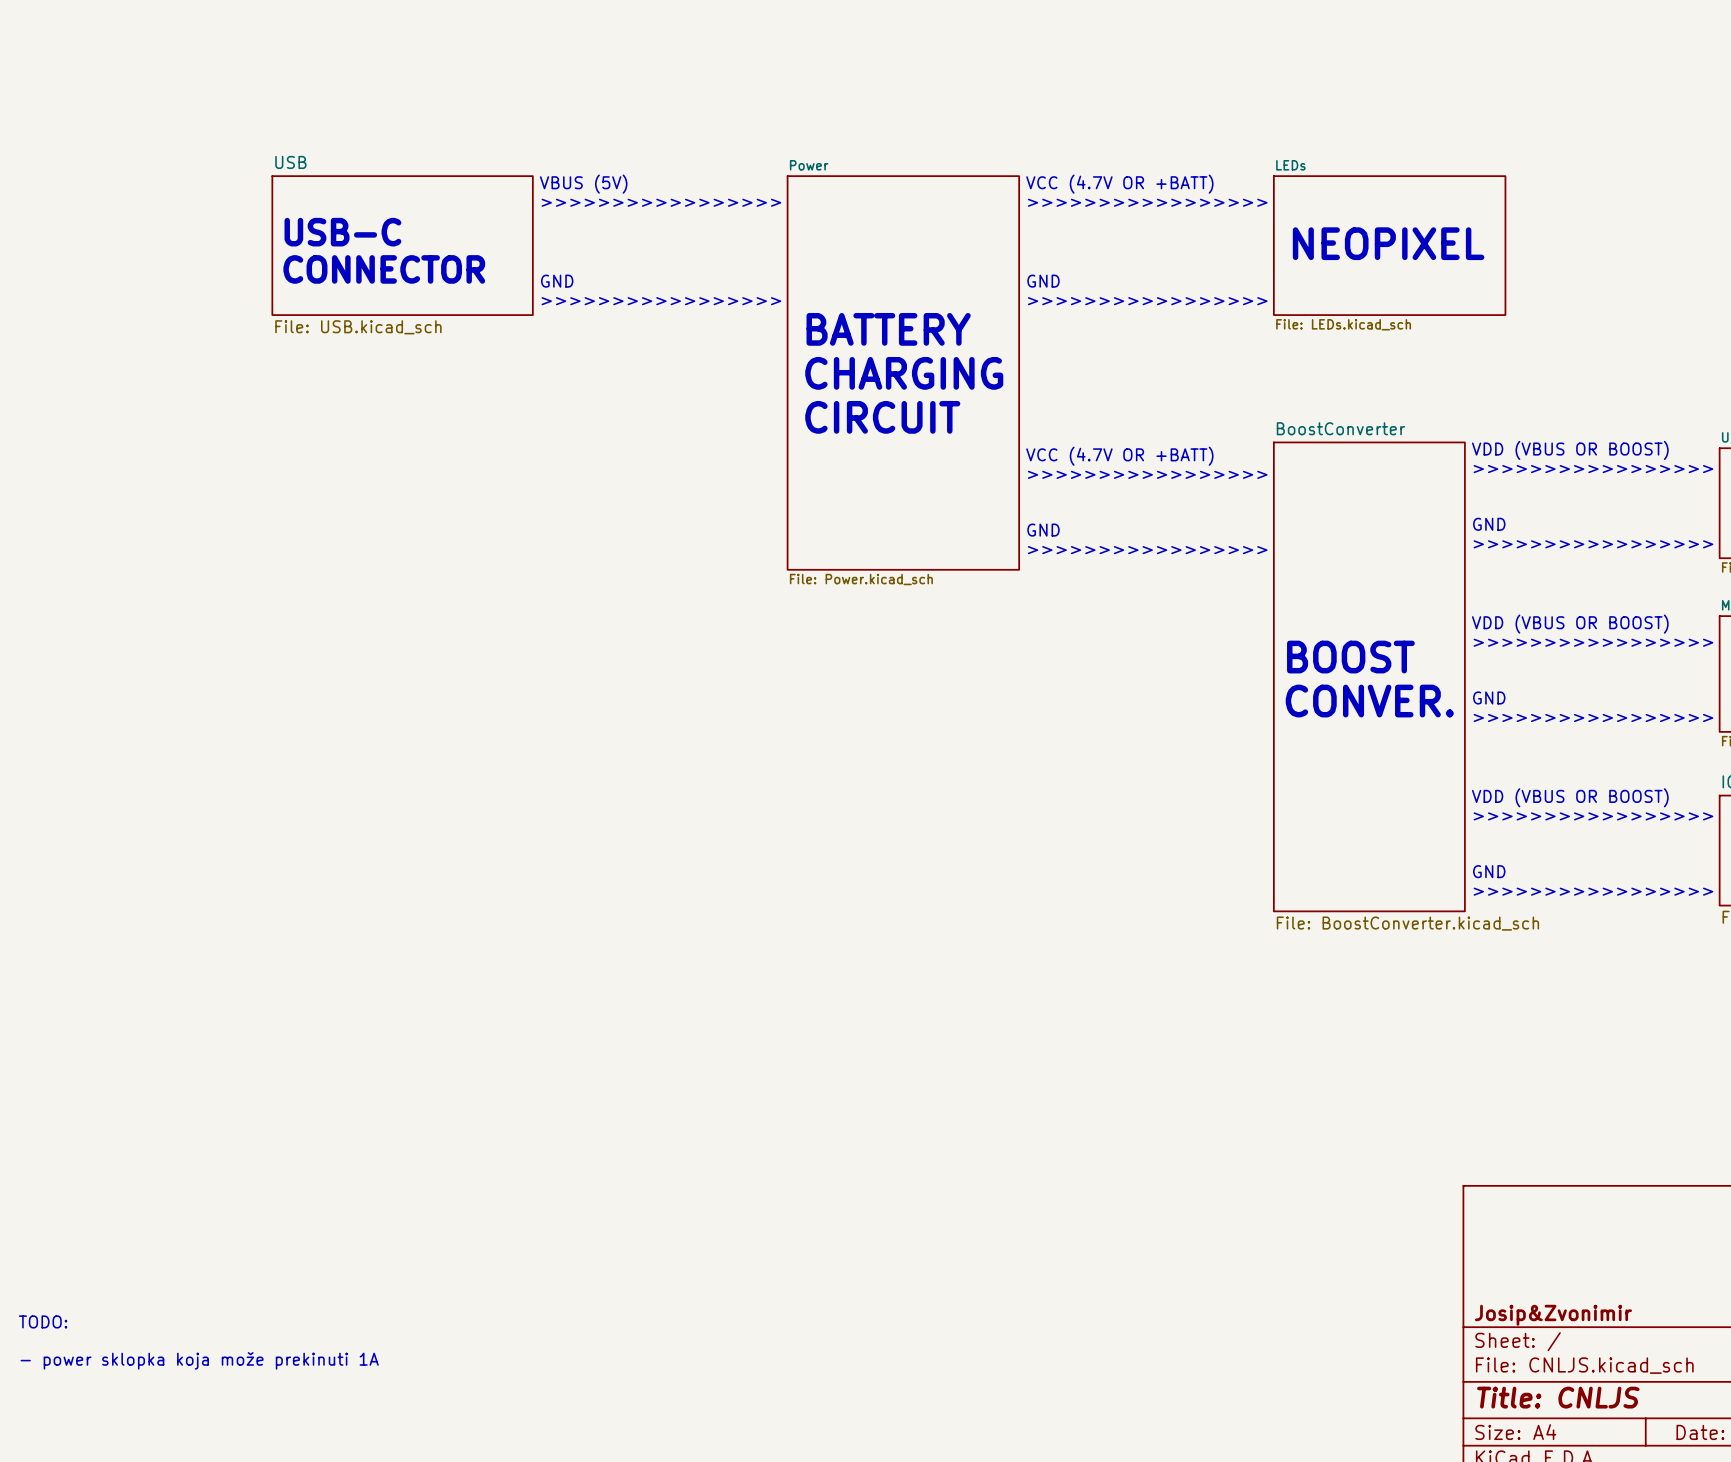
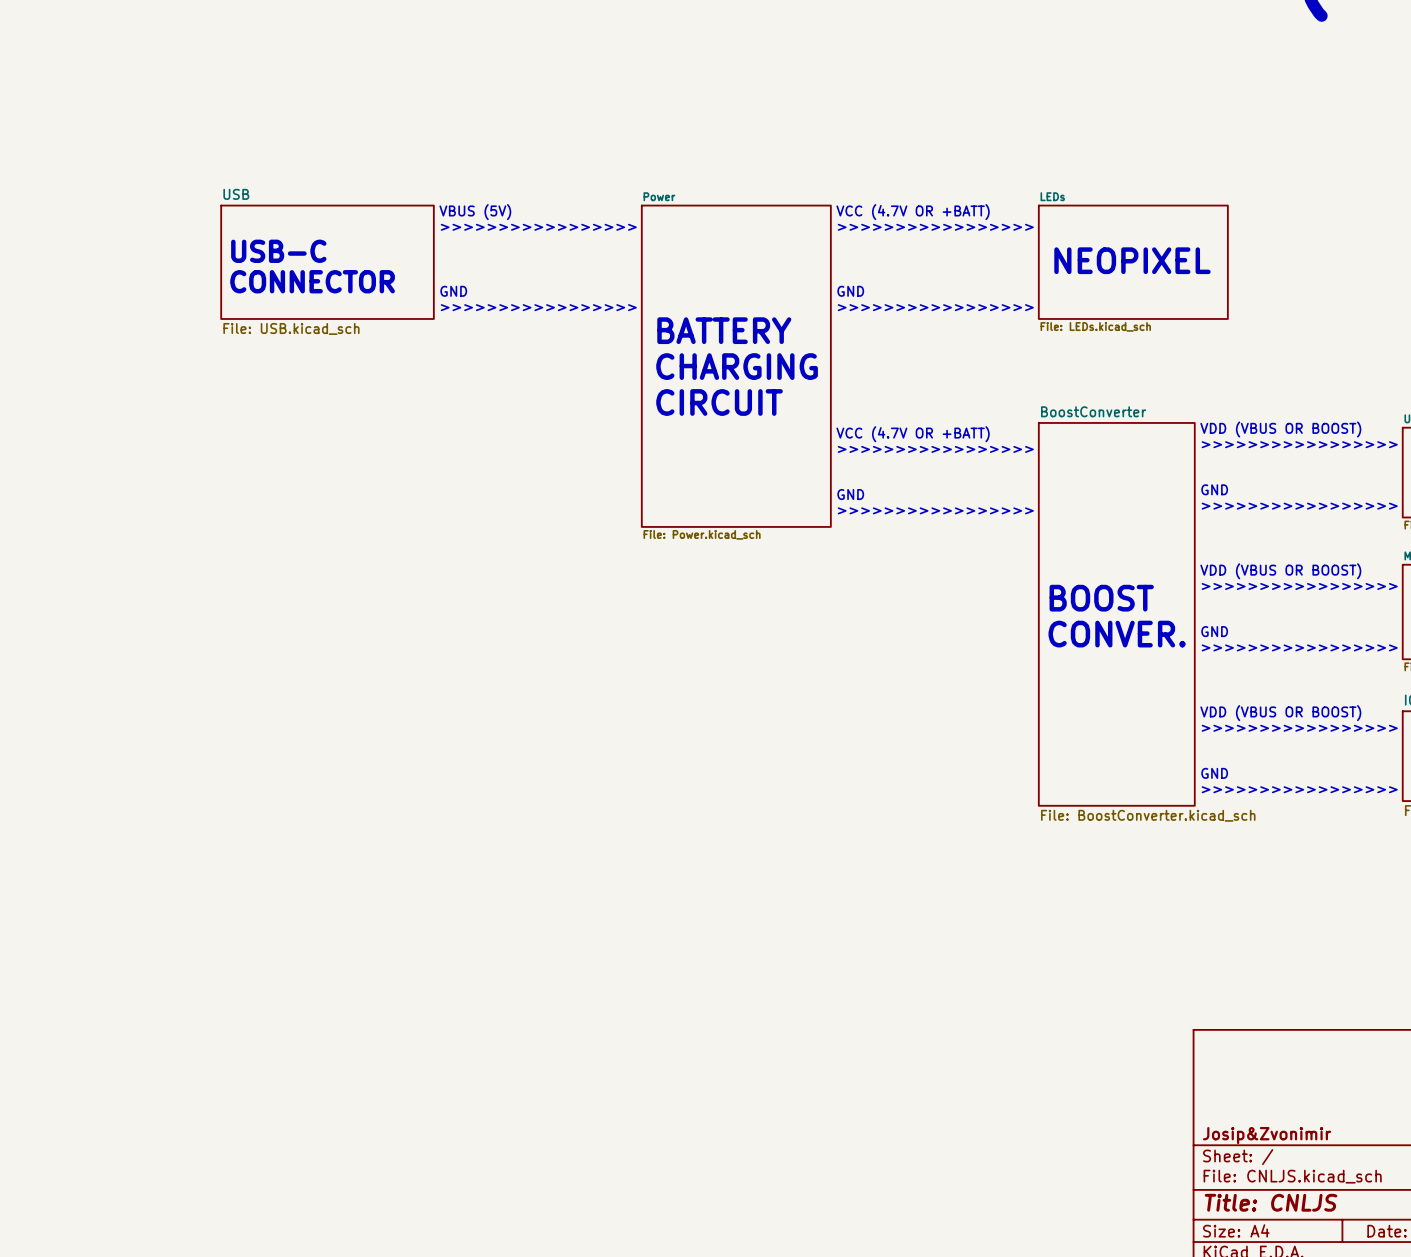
text: TODO: (43, 1321) -> none
text: - power sklopka koja može prekinuti 1A (199, 1360) -> none

